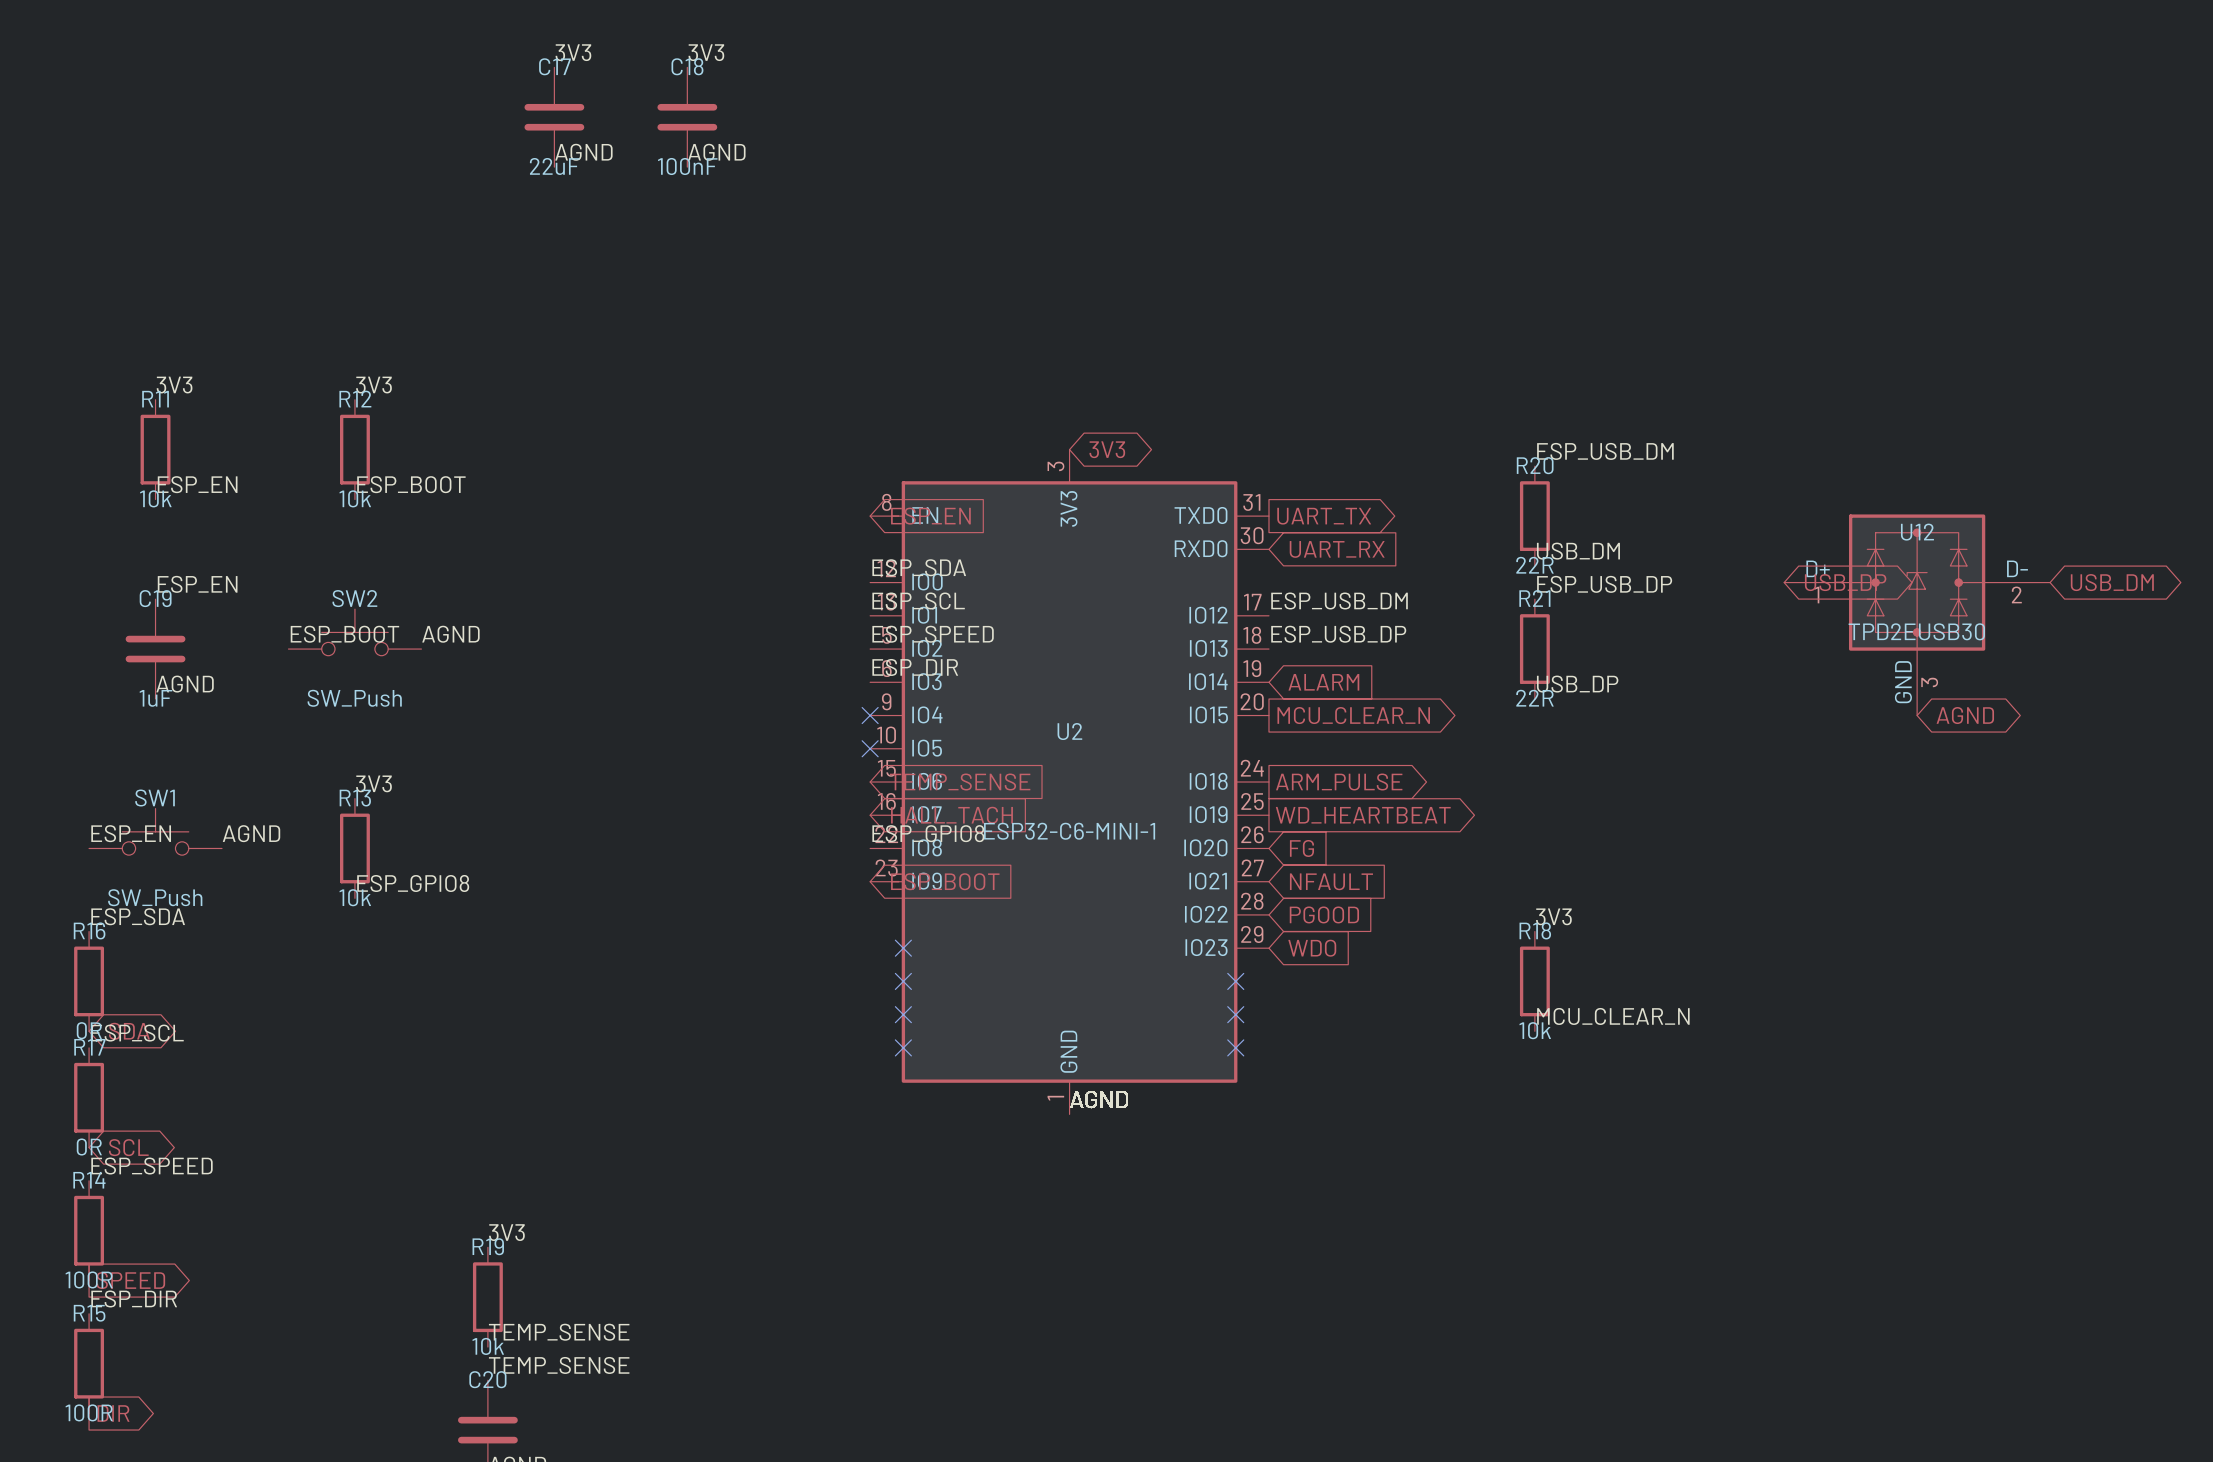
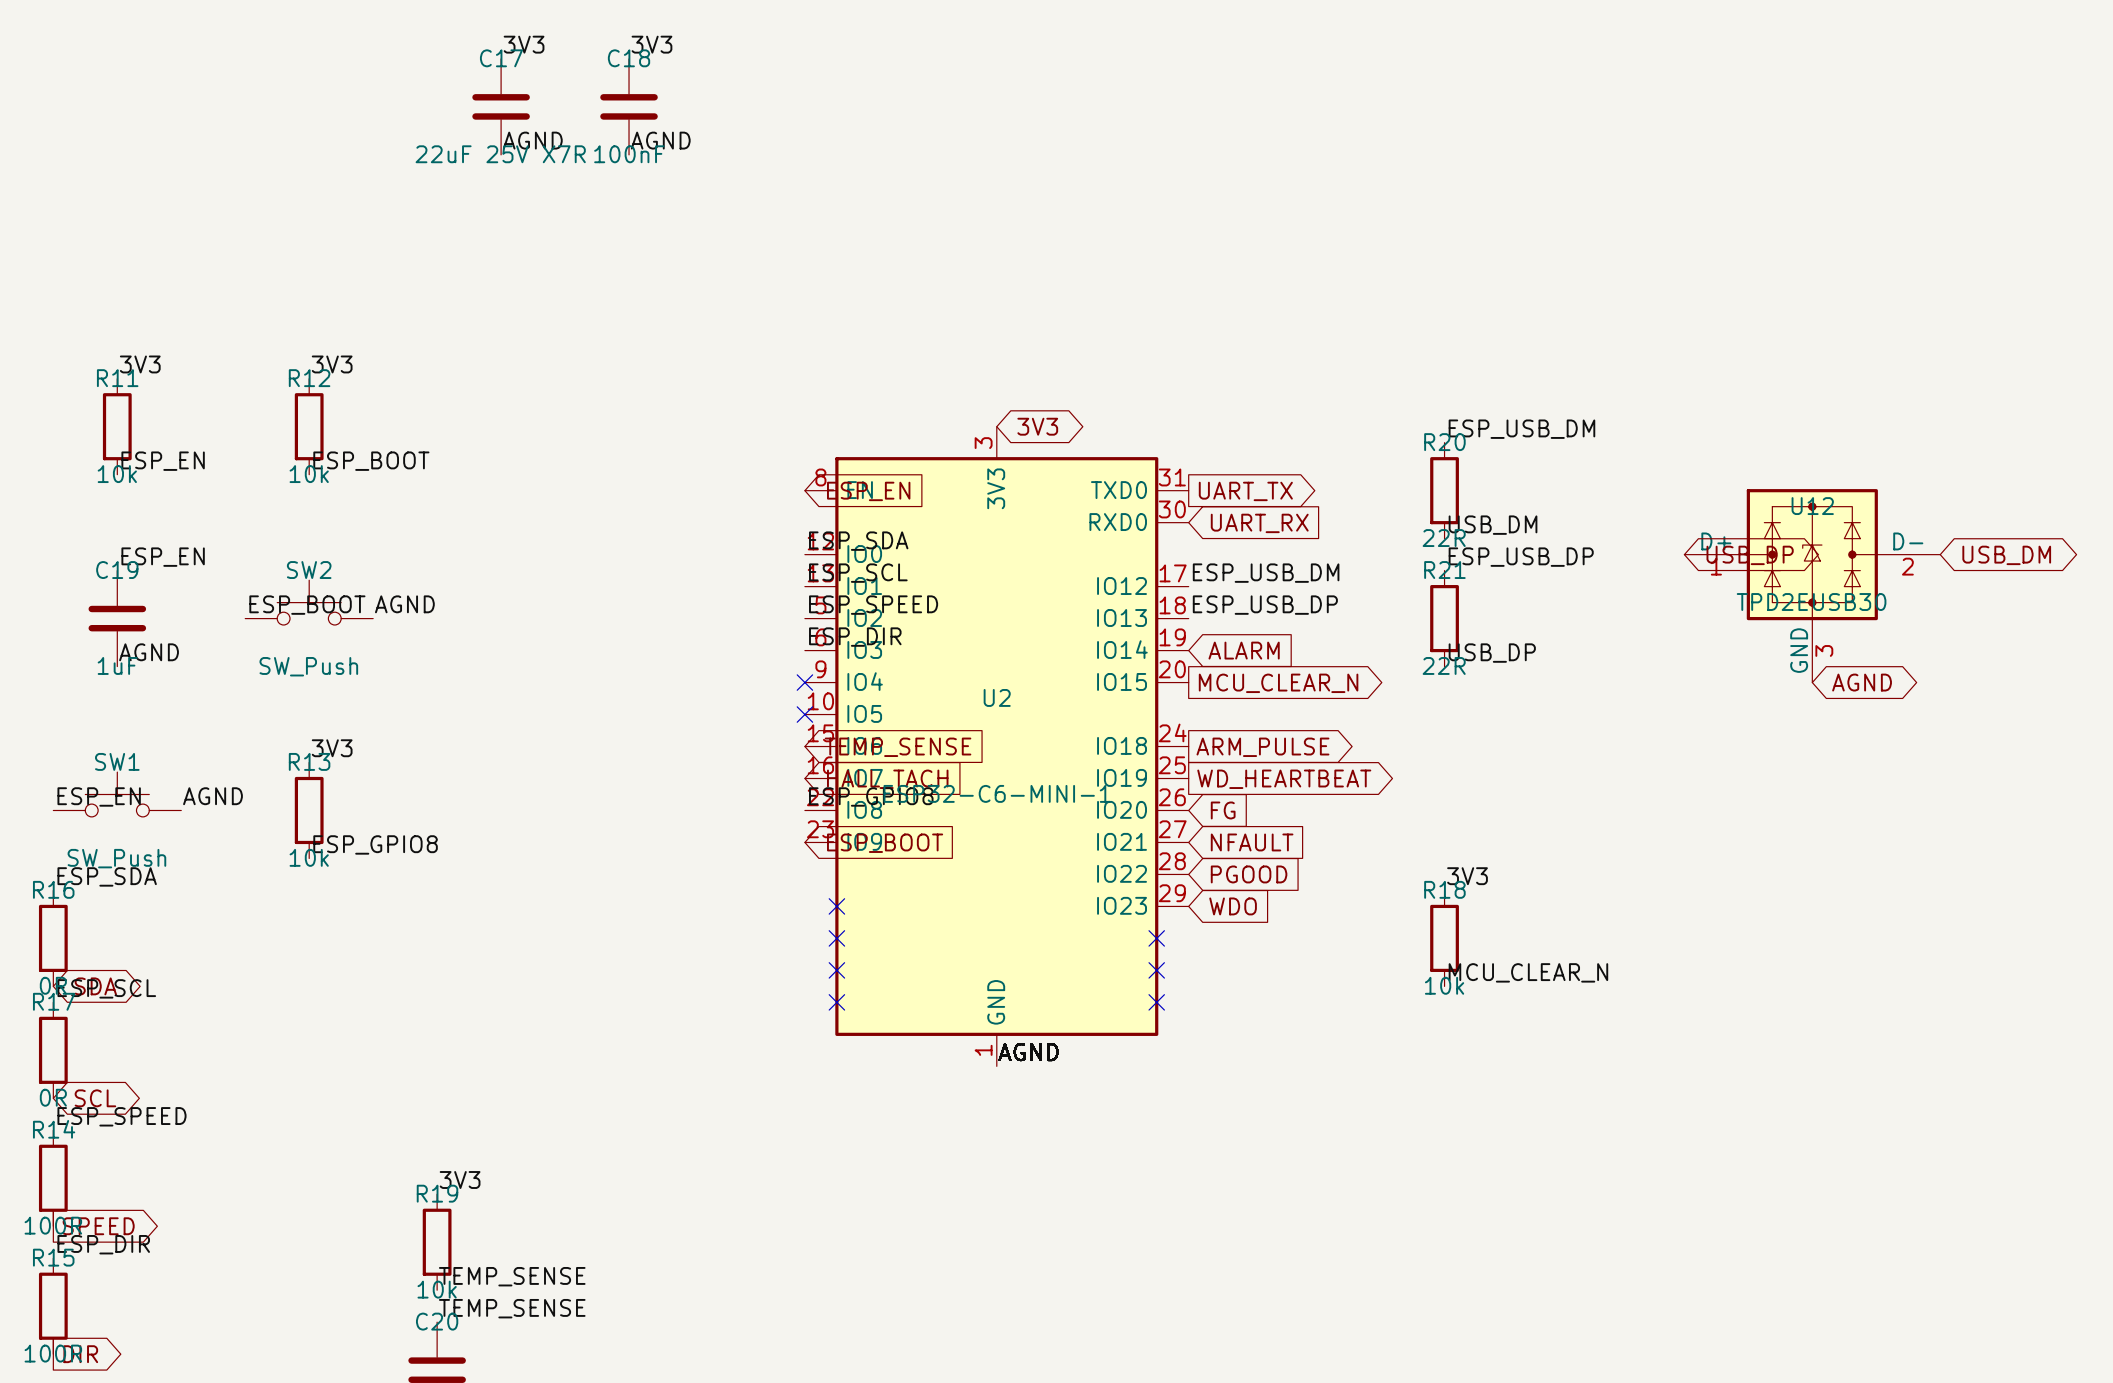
C17 value: 22uF (554, 166) -> 22uF 25V X7R (500, 154)

